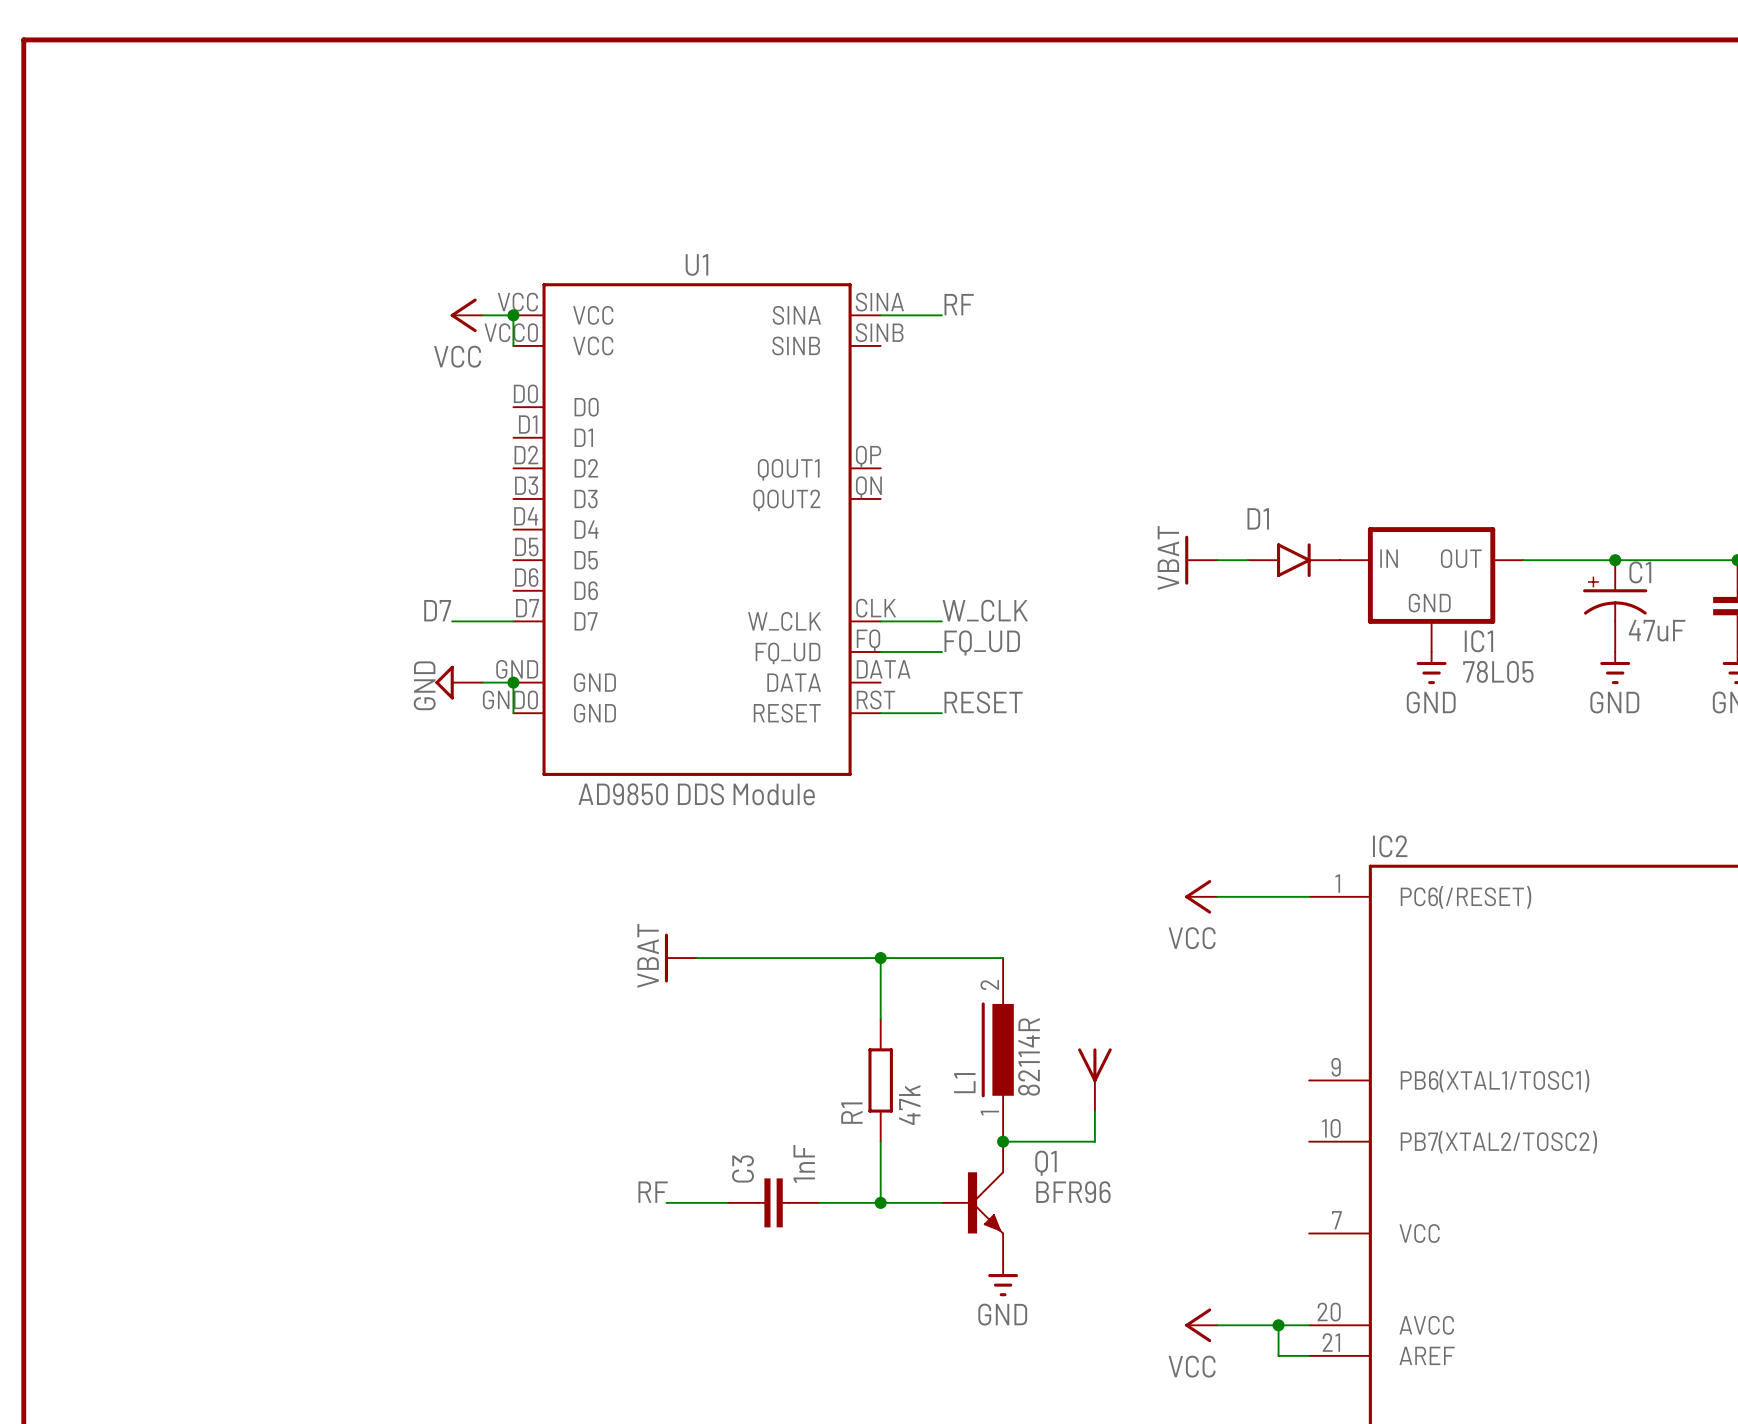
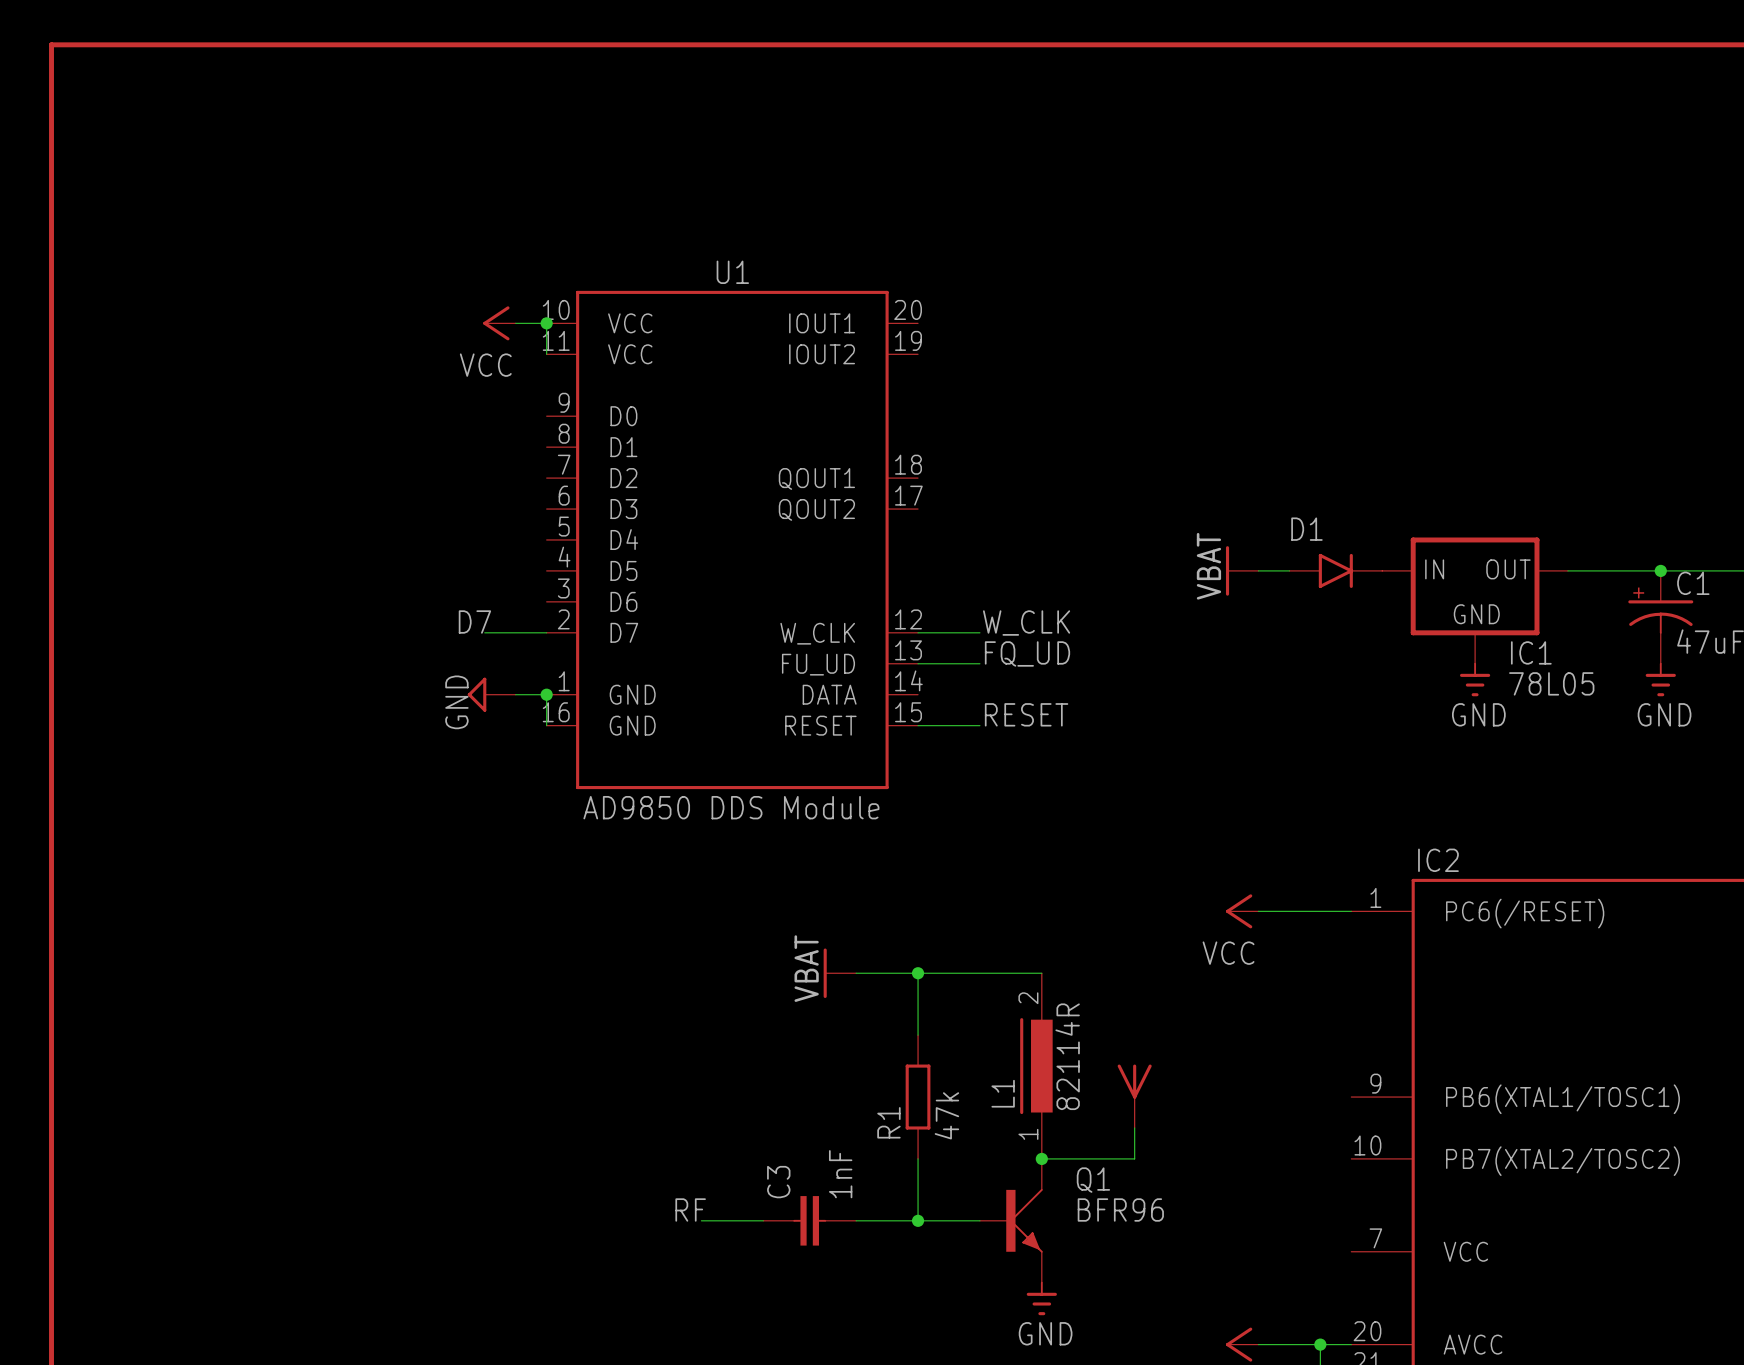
U1 symbol: [513, 283, 881, 776] -> [546, 290, 919, 790]
label: RF (959, 304) -> none
wire: (880, 315) (941, 315) -> none
power symbol position: VBAT (680, 958) -> VBAT (839, 973)
wire: (697, 958) (819, 958) -> none

